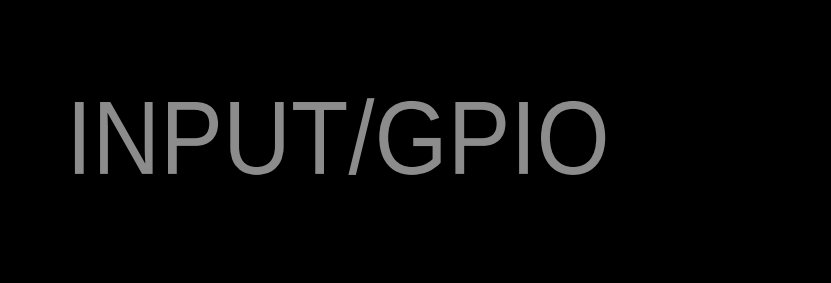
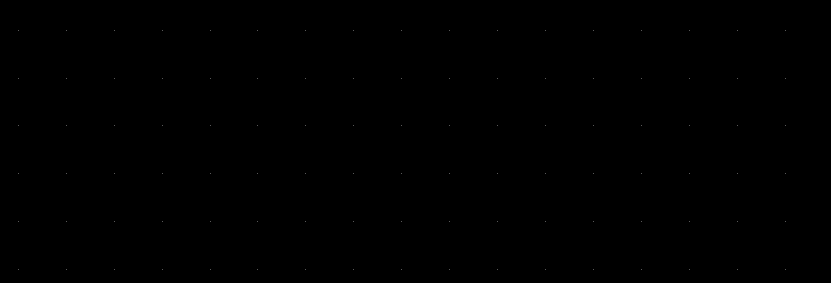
text: INPUT/GPIO (340, 136) -> none

